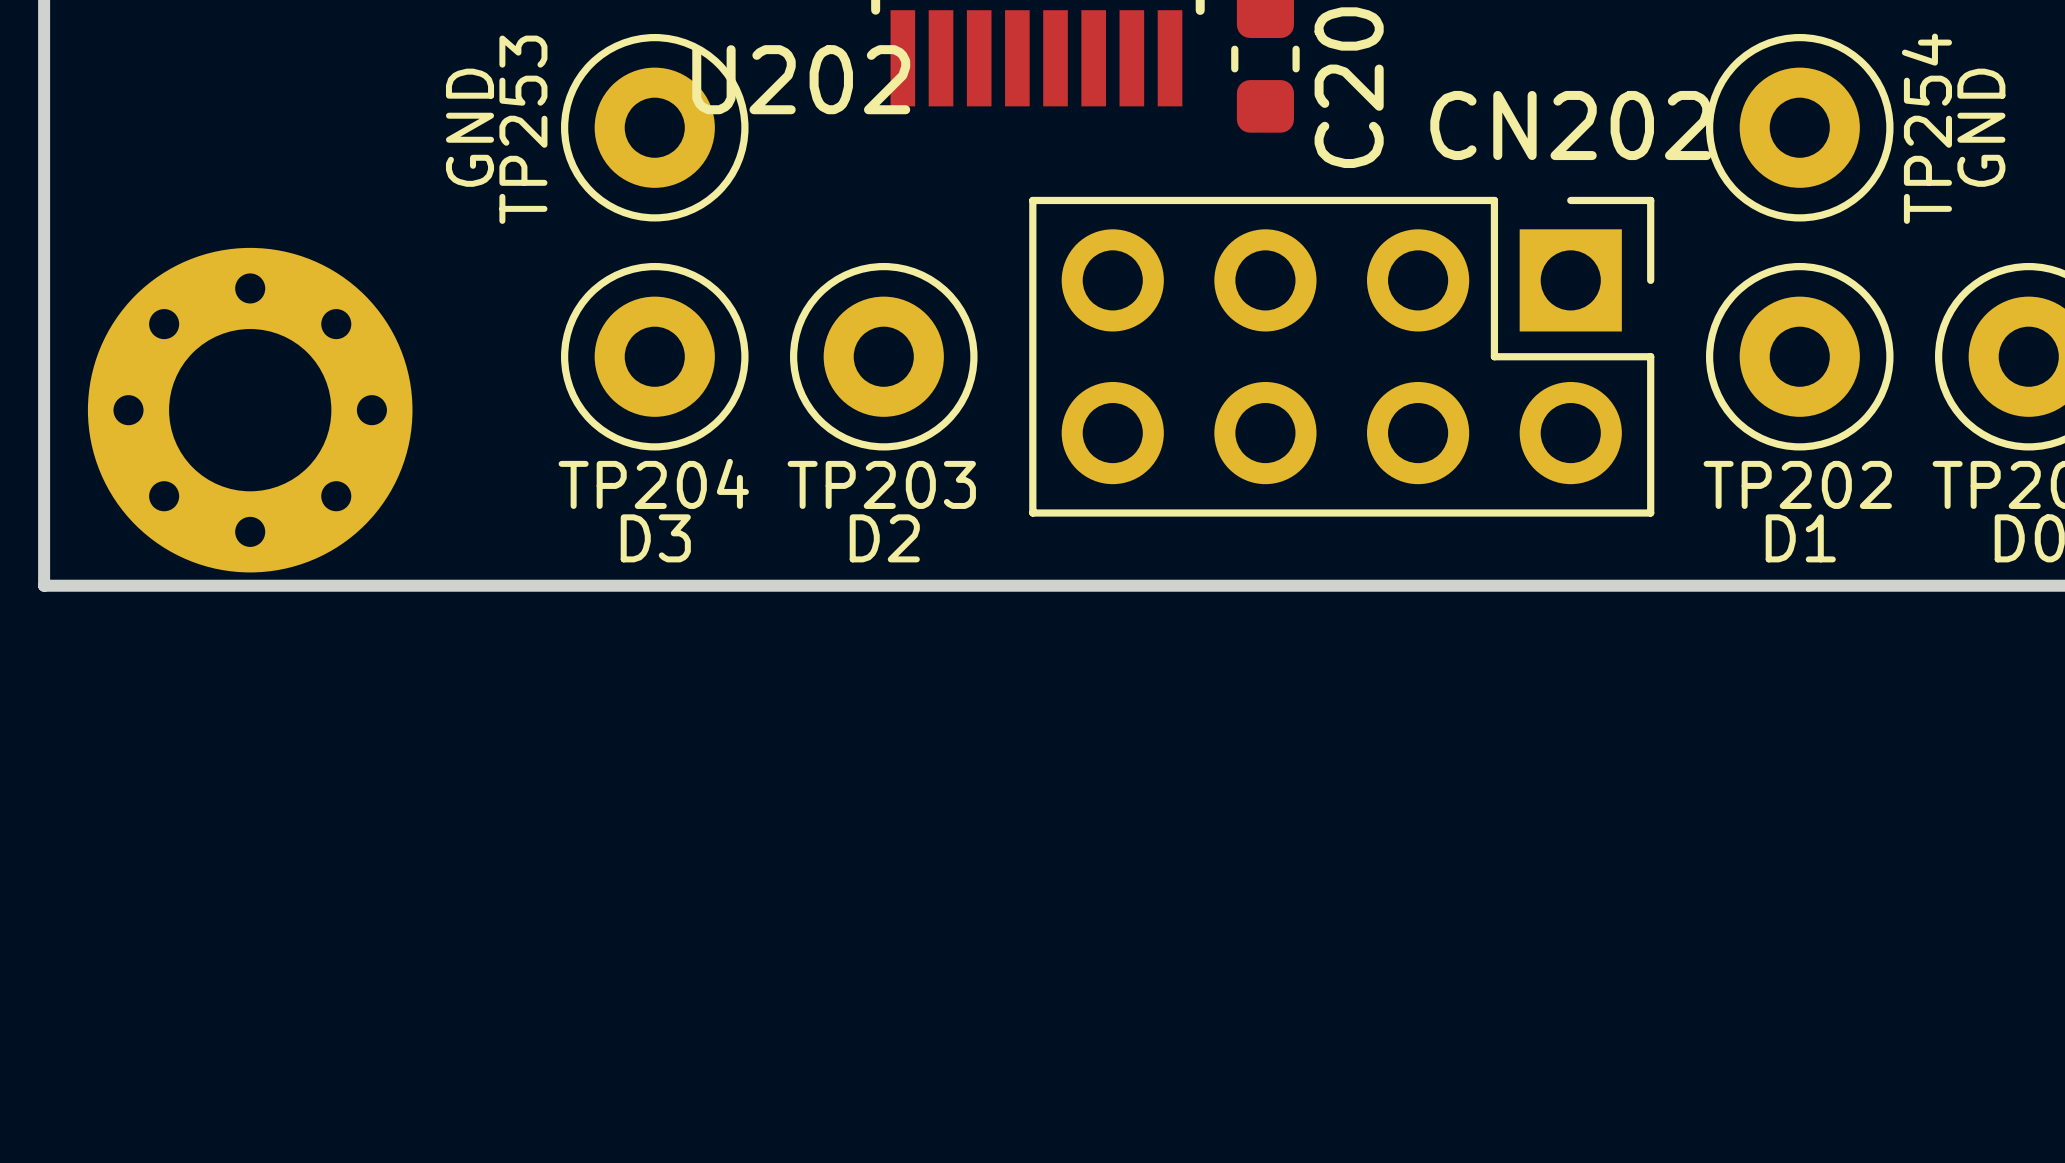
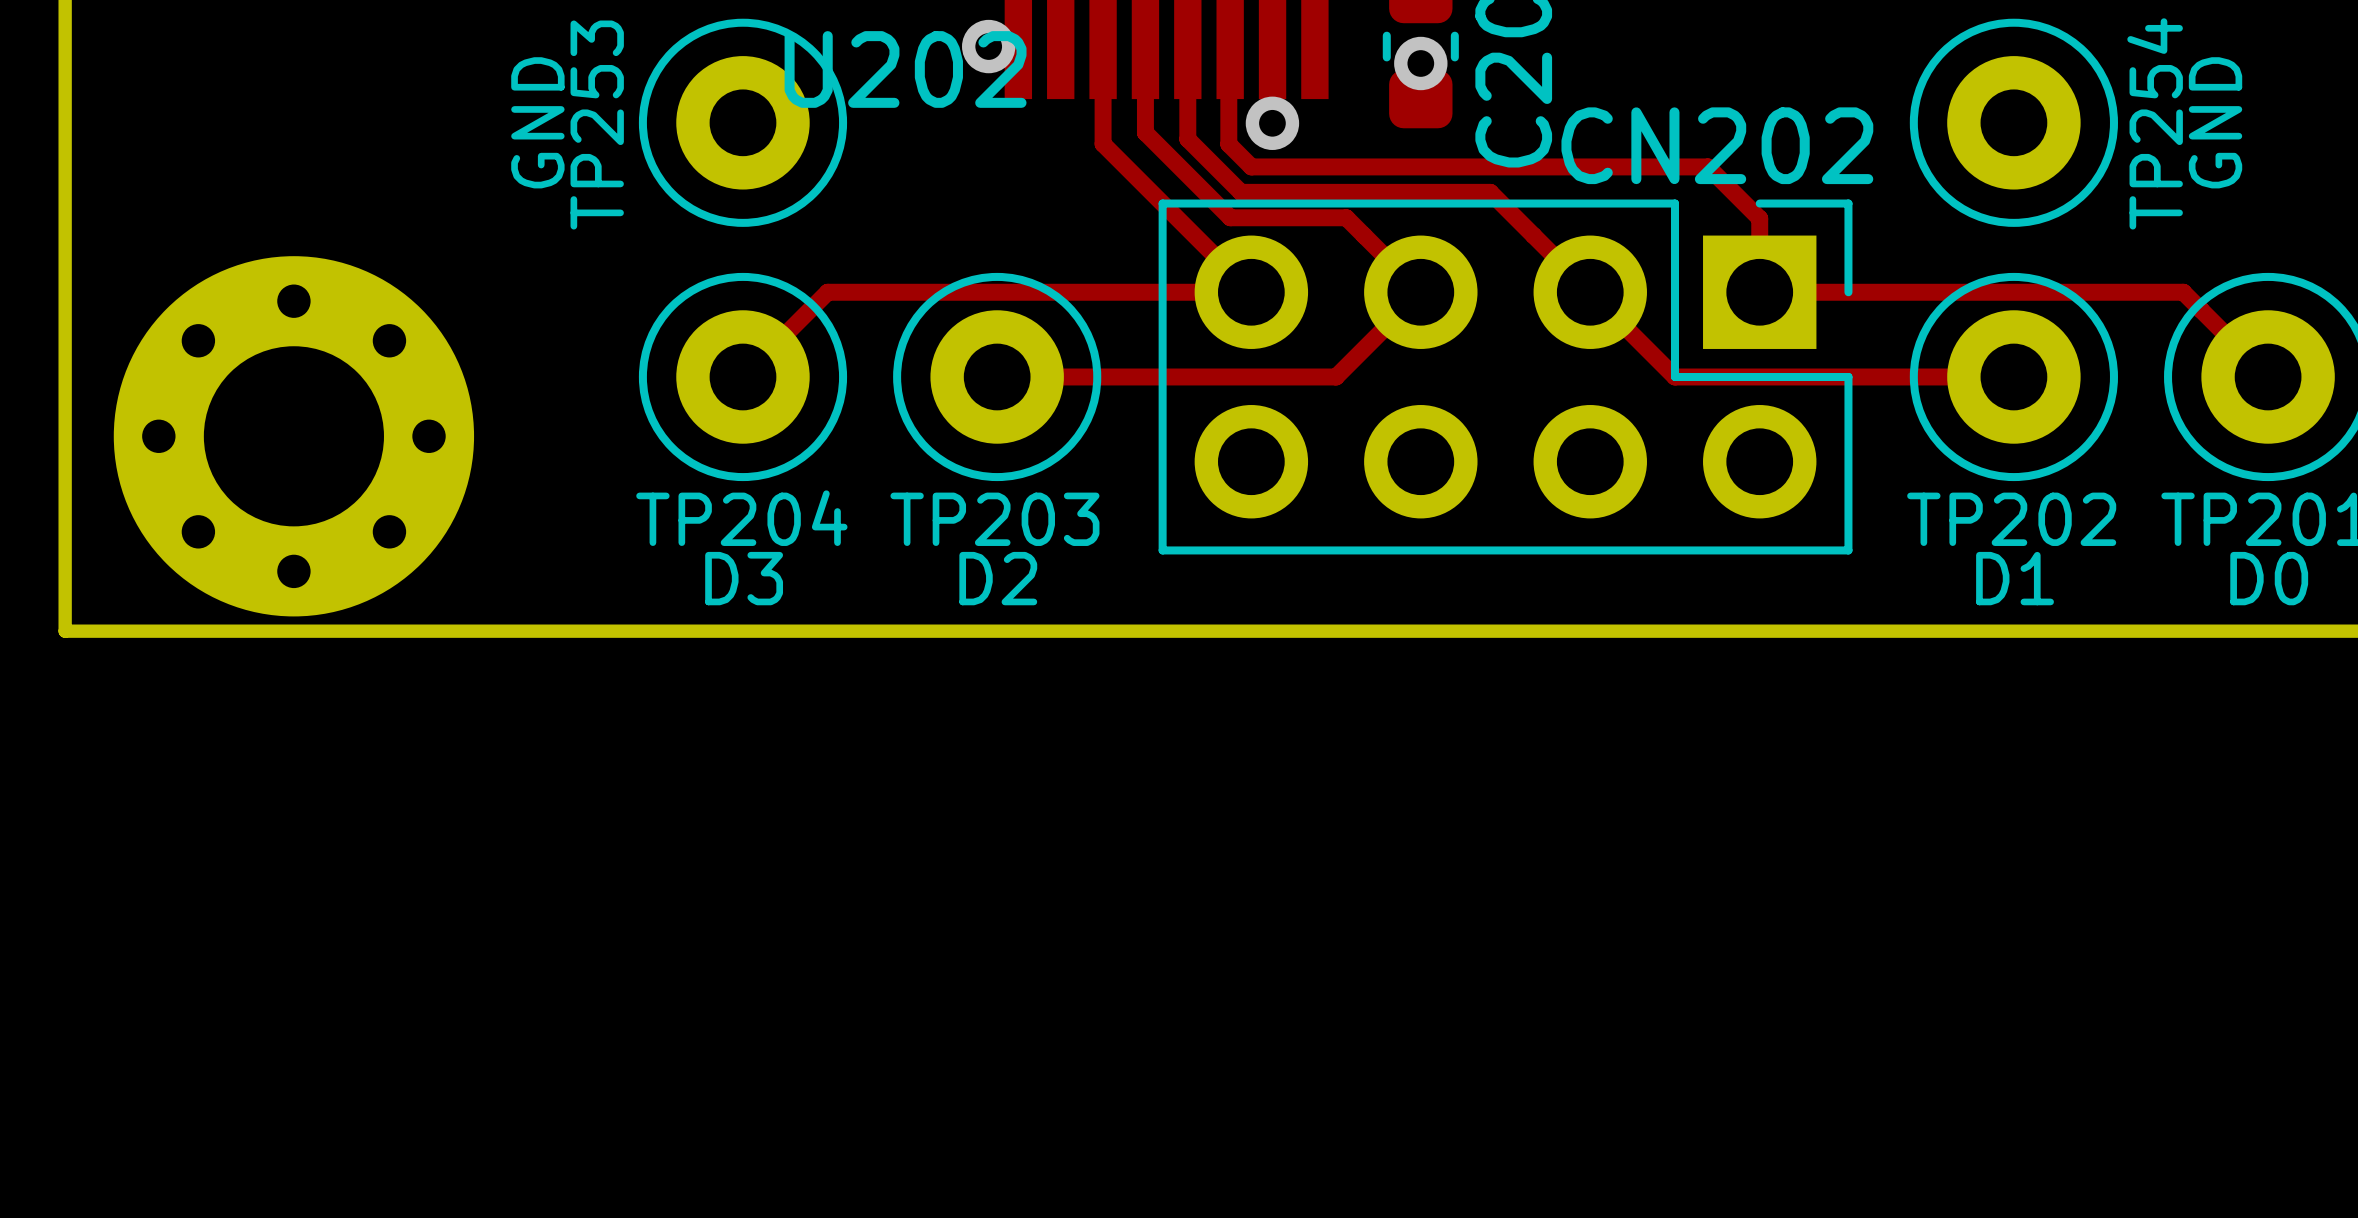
track: none -> (1103, 45) (1103, 143) (1251, 292) (827, 292) (742, 376)
track: none -> (1145, 45) (1145, 132) (1230, 217) (1346, 217) (1420, 292) (1336, 376) (997, 376)
track: none -> (1187, 45) (1187, 139) (1240, 192) (1490, 192) (1675, 376) (2013, 376)
track: none -> (1230, 45) (1228, 144) (1251, 166) (1708, 166) (1759, 218) (1759, 292) (2183, 292) (2268, 376)
via: none -> (988, 46)
via: none -> (1420, 63)
CN202 name position: CN202 (1570, 125) -> CN202 (1717, 145)
via: none -> (1272, 123)

